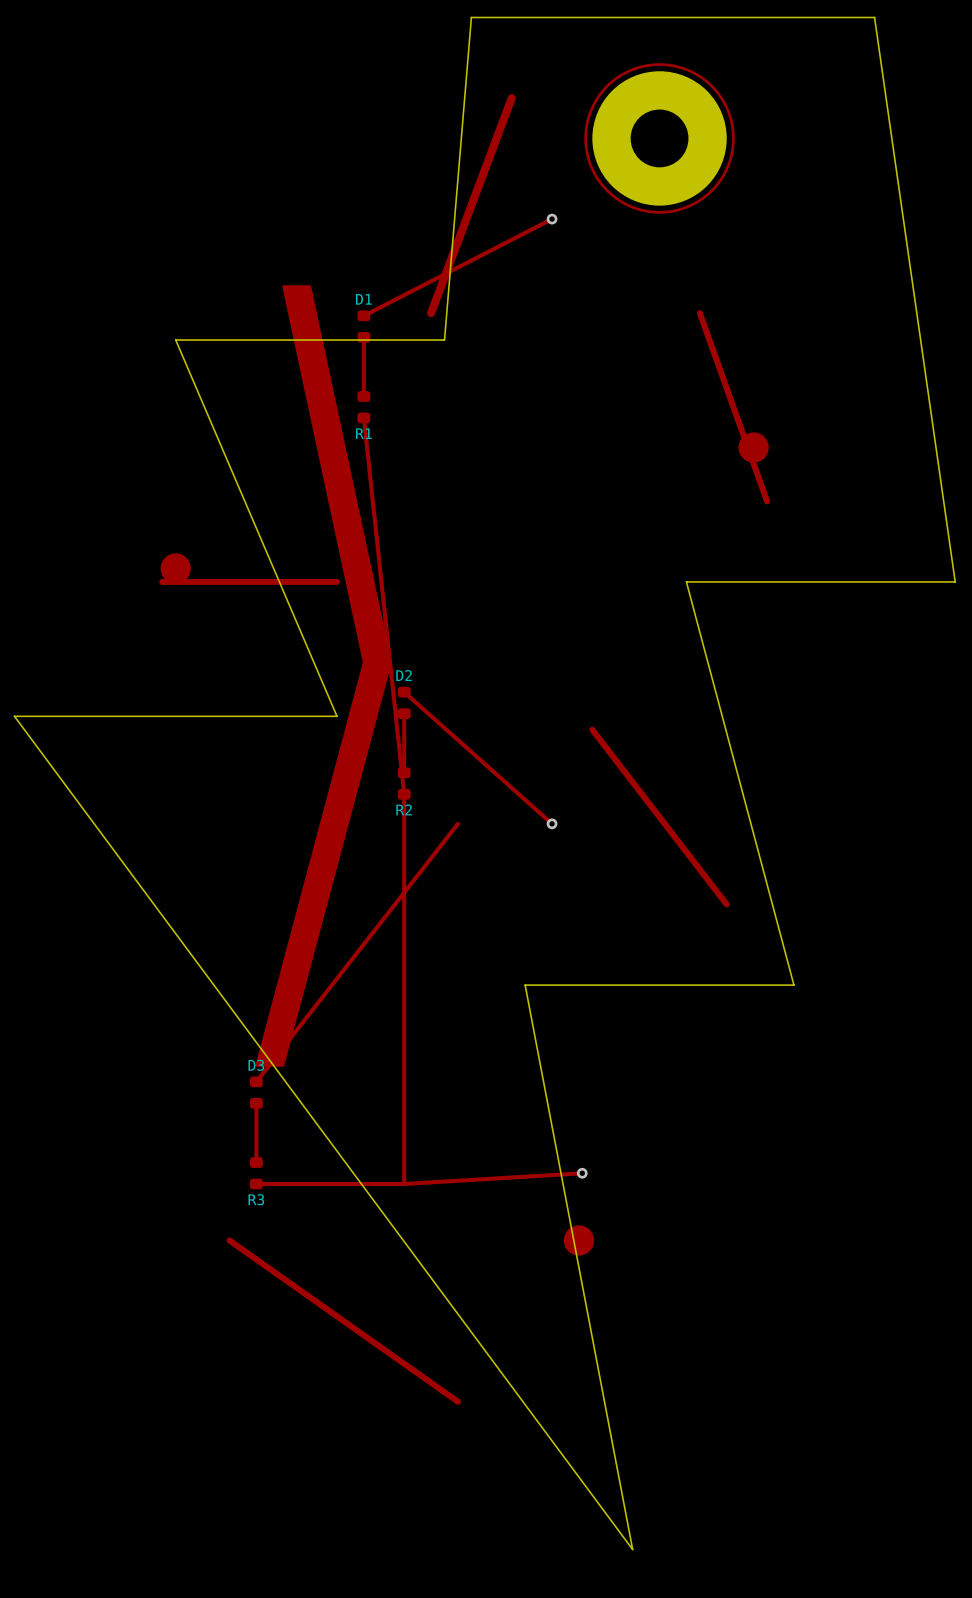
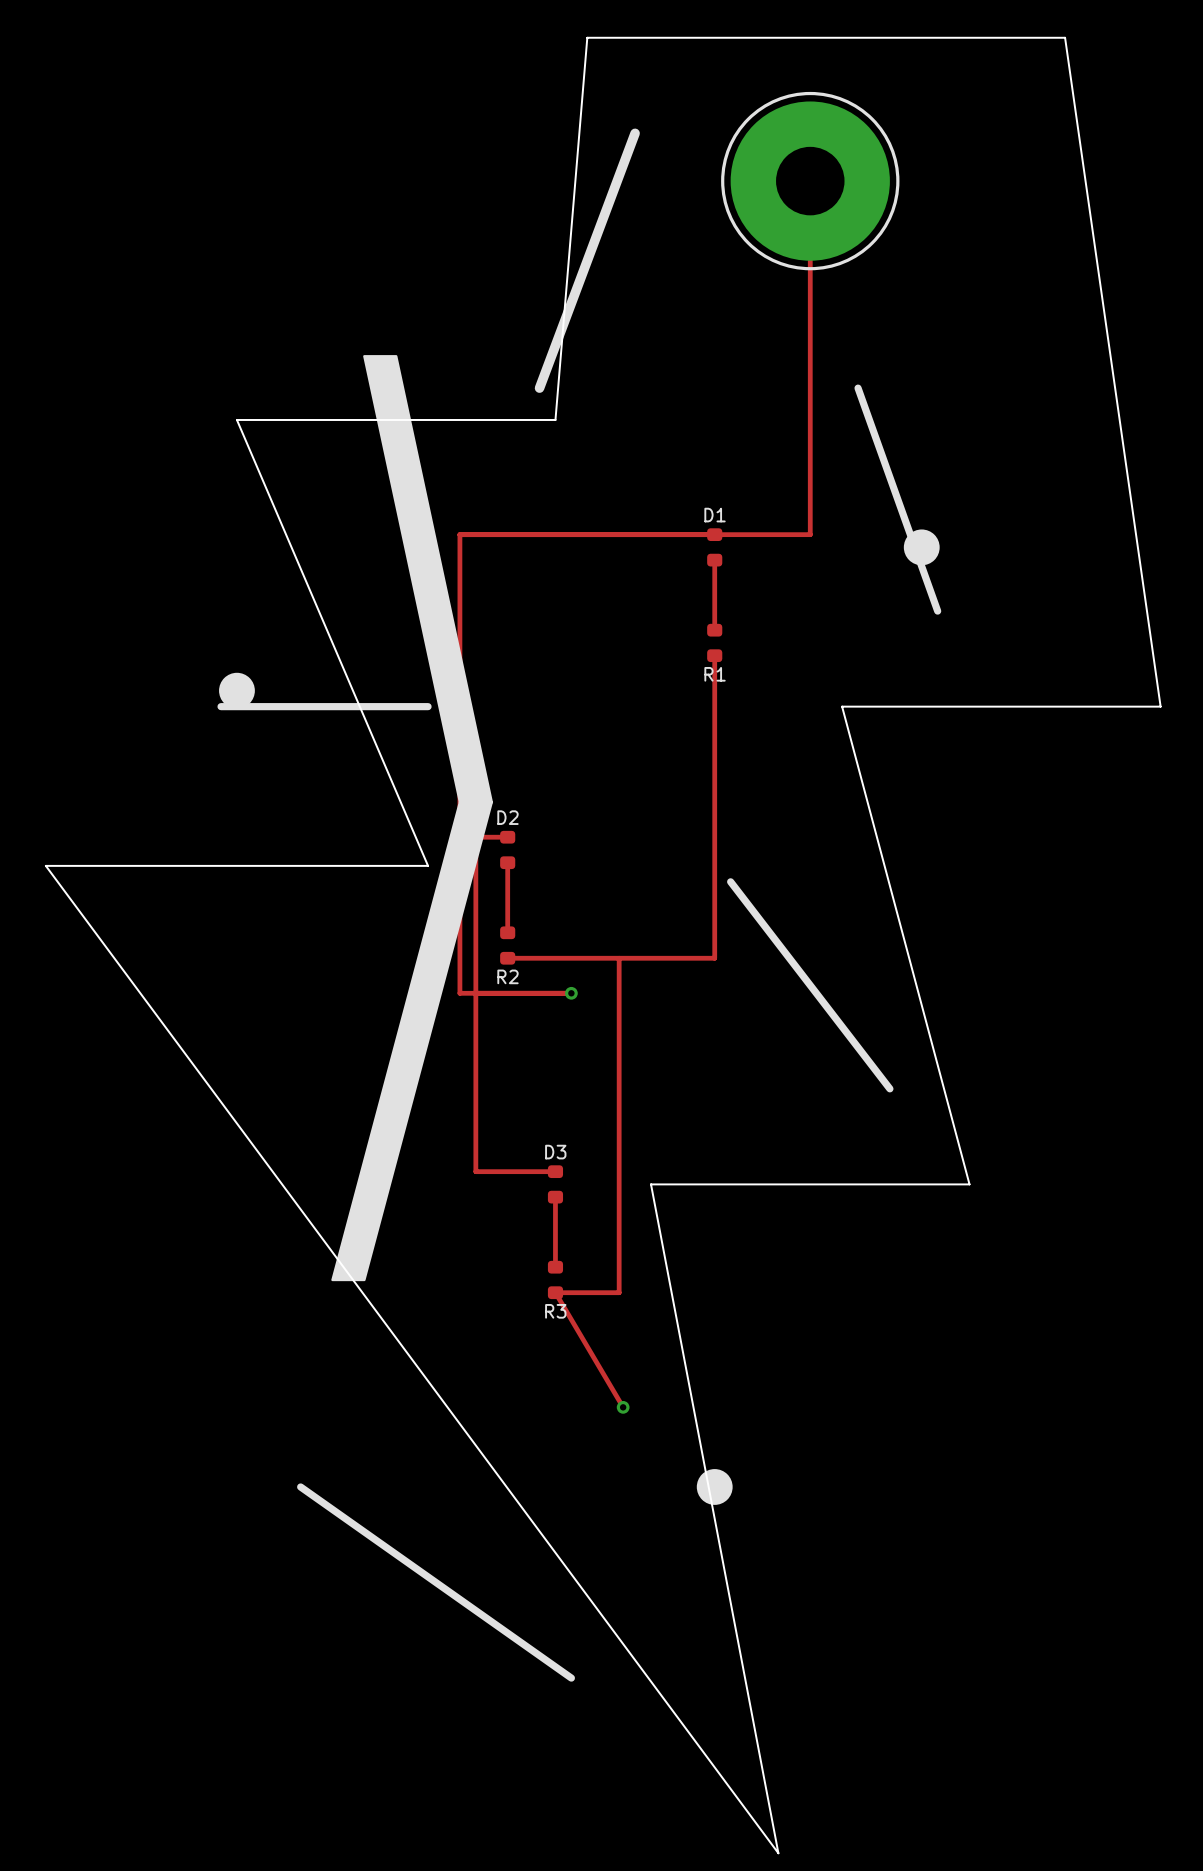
part footprint: [584, 63, 735, 214] -> [721, 91, 900, 271]
track: (511, 98) (431, 313) -> none
line: none -> (635, 133) (539, 388)
track: (552, 219) (363, 315) -> none
via: (552, 219) -> none
drawing shape: [282, 285, 392, 664] -> [363, 355, 493, 804]
track: (699, 313) (767, 501) -> none
line: none -> (858, 388) (937, 611)
D1 position: (363, 326) -> (714, 547)
track: (363, 337) (363, 396) -> (714, 560) (714, 630)
R1 position: (363, 407) -> (714, 642)
track: (363, 417) (404, 794) (404, 1184) -> none
drawing shape: [738, 432, 769, 463] -> [903, 529, 940, 566]
track: none -> (714, 655) (714, 958) (507, 958)
drawing shape: [160, 553, 191, 584] -> [219, 672, 255, 709]
track: (162, 581) (337, 581) -> none
line: none -> (221, 706) (428, 706)
drawing shape: [255, 661, 392, 1067] -> [331, 800, 493, 1282]
track: (404, 692) (552, 823) -> (507, 837) (475, 837) (475, 1171) (555, 1171)
track: (592, 729) (726, 904) -> none
line: none -> (730, 881) (889, 1088)
track: none -> (619, 958) (619, 1292) (555, 1292) (623, 1407)
track: (457, 823) (256, 1081) -> (571, 993) (459, 993) (459, 534) (810, 534) (810, 181)
via: none -> (571, 993)
via: (552, 823) -> none
D3 position: (256, 1092) -> (555, 1184)
track: (256, 1103) (256, 1162) -> (555, 1197) (555, 1267)
R3 position: (256, 1173) -> (555, 1279)
track: (582, 1173) (404, 1184) -> none
via position: (582, 1173) -> (623, 1407)
track: (256, 1184) (404, 1184) -> none
drawing shape: [563, 1225, 595, 1256] -> [696, 1469, 733, 1505]
track: (229, 1240) (457, 1401) -> none
line: none -> (300, 1486) (571, 1678)

